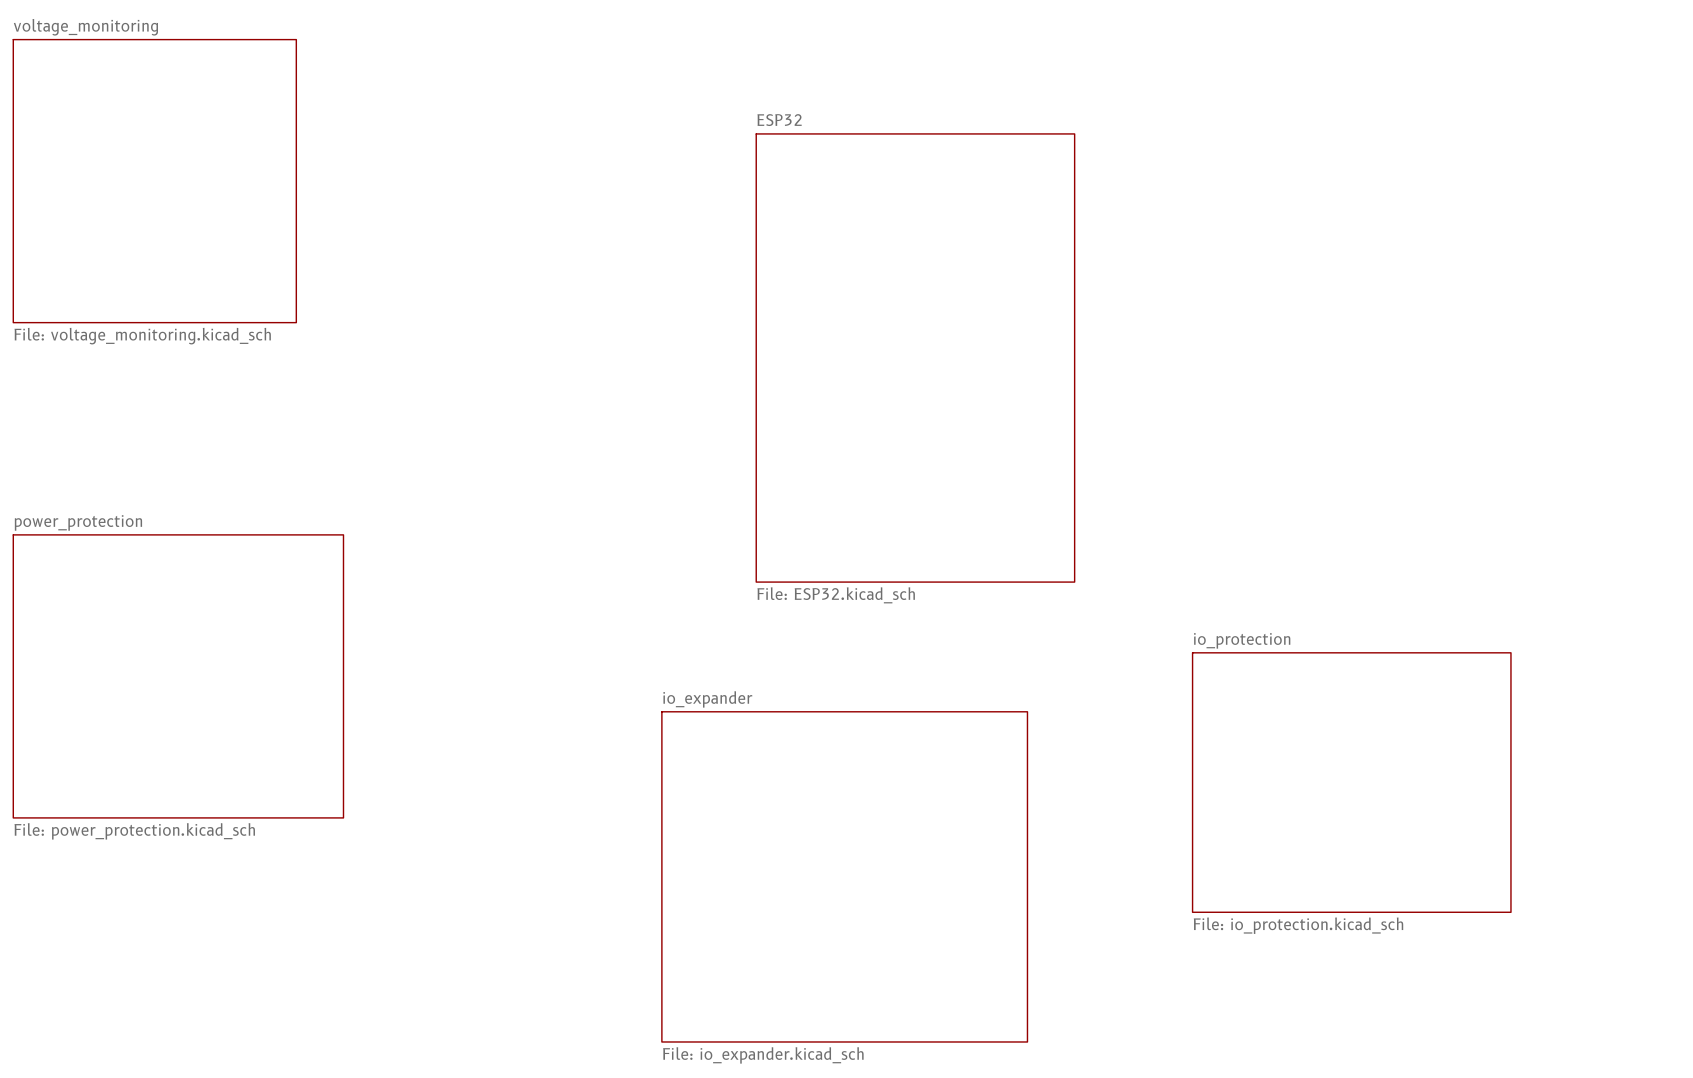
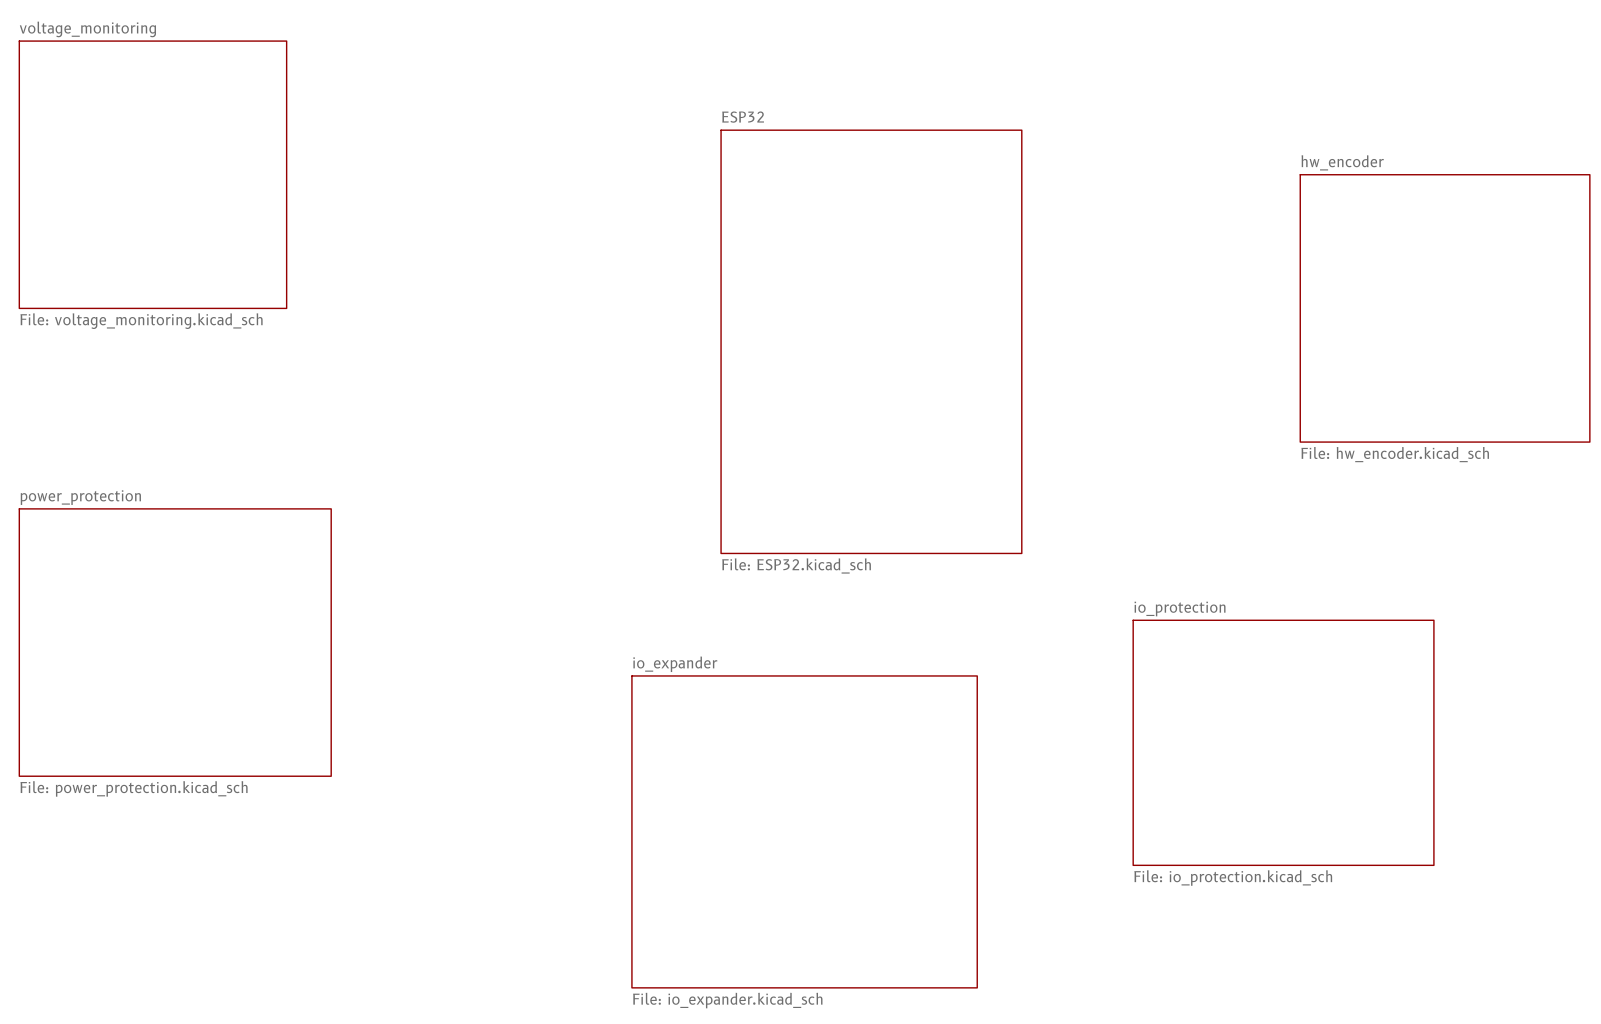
sheet hw_encoder: none -> File: hw_encoder.kicad_sch (1445, 308)

